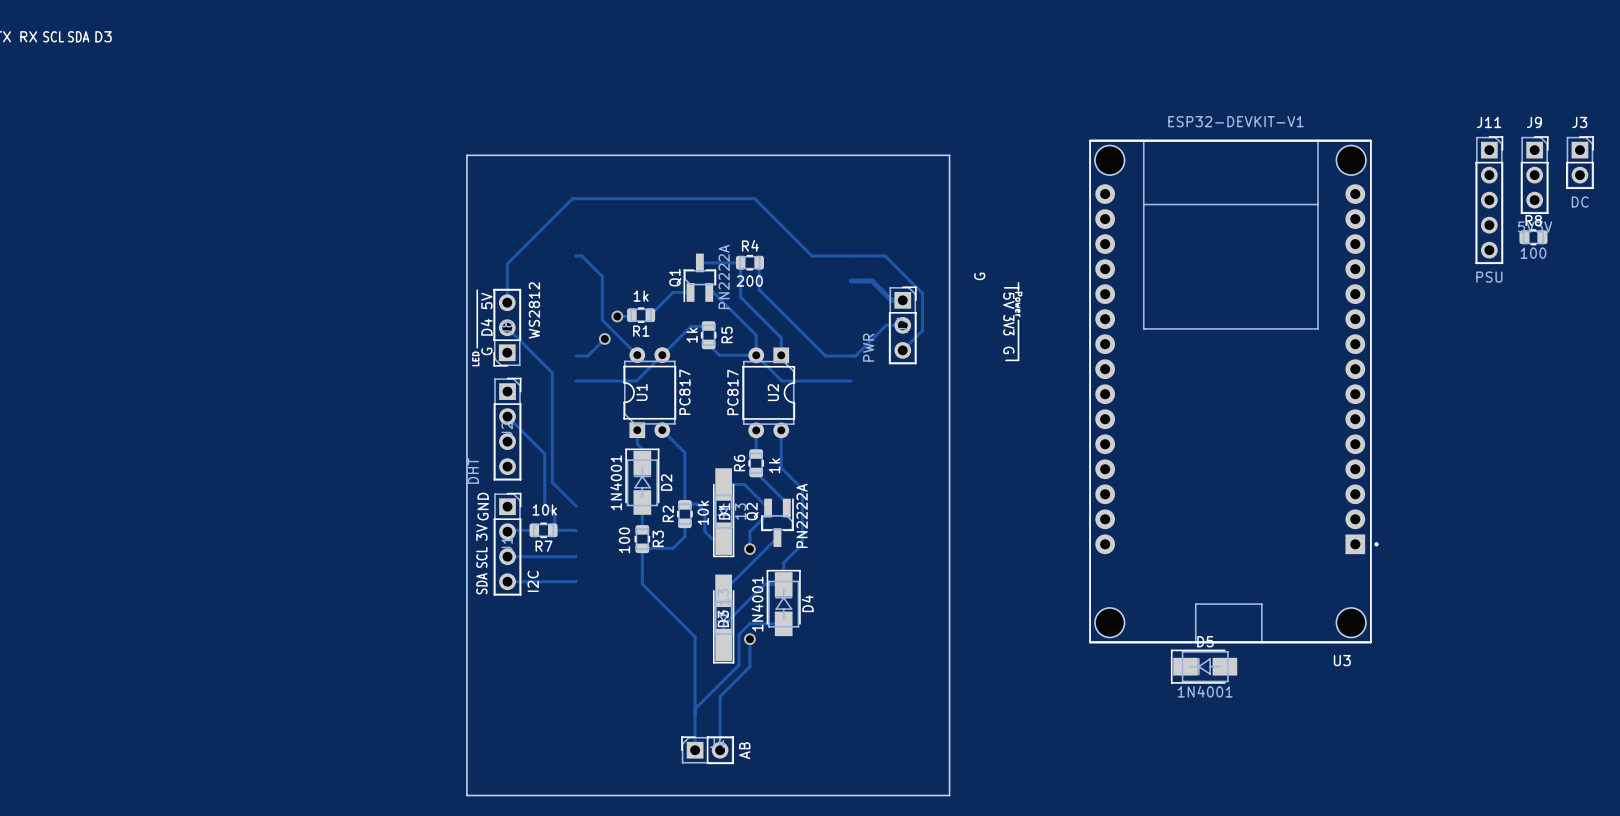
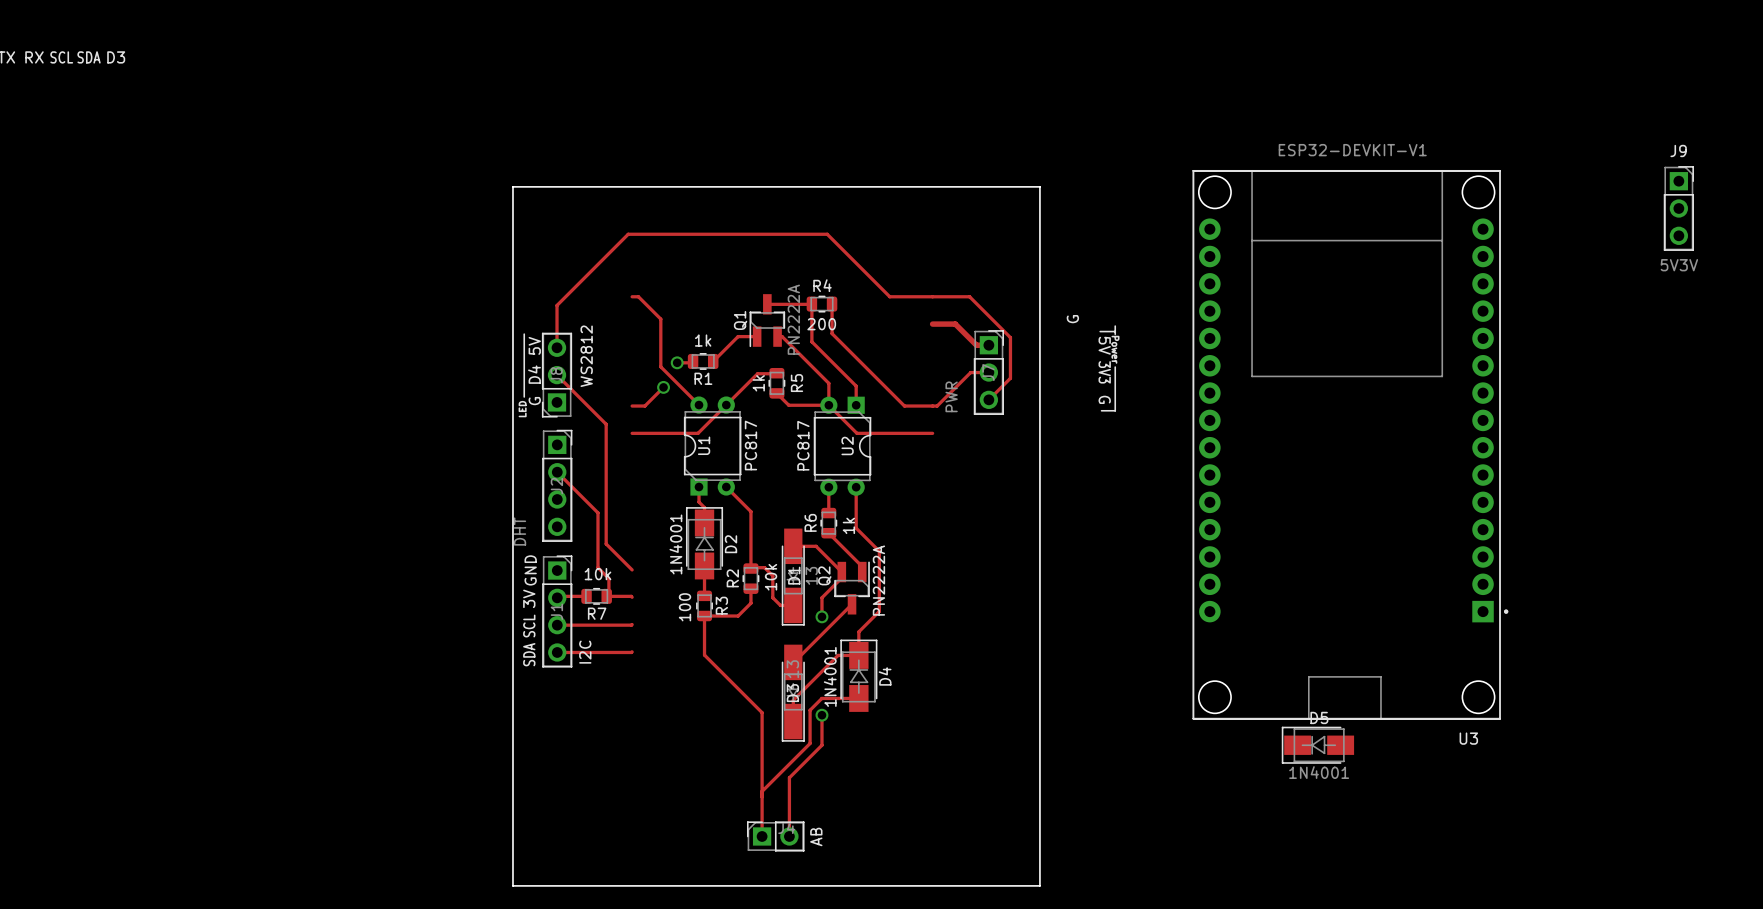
J3: DC (1579, 162) -> none
J11: PSU (1489, 200) -> none
R8: 100 (1533, 237) -> none

